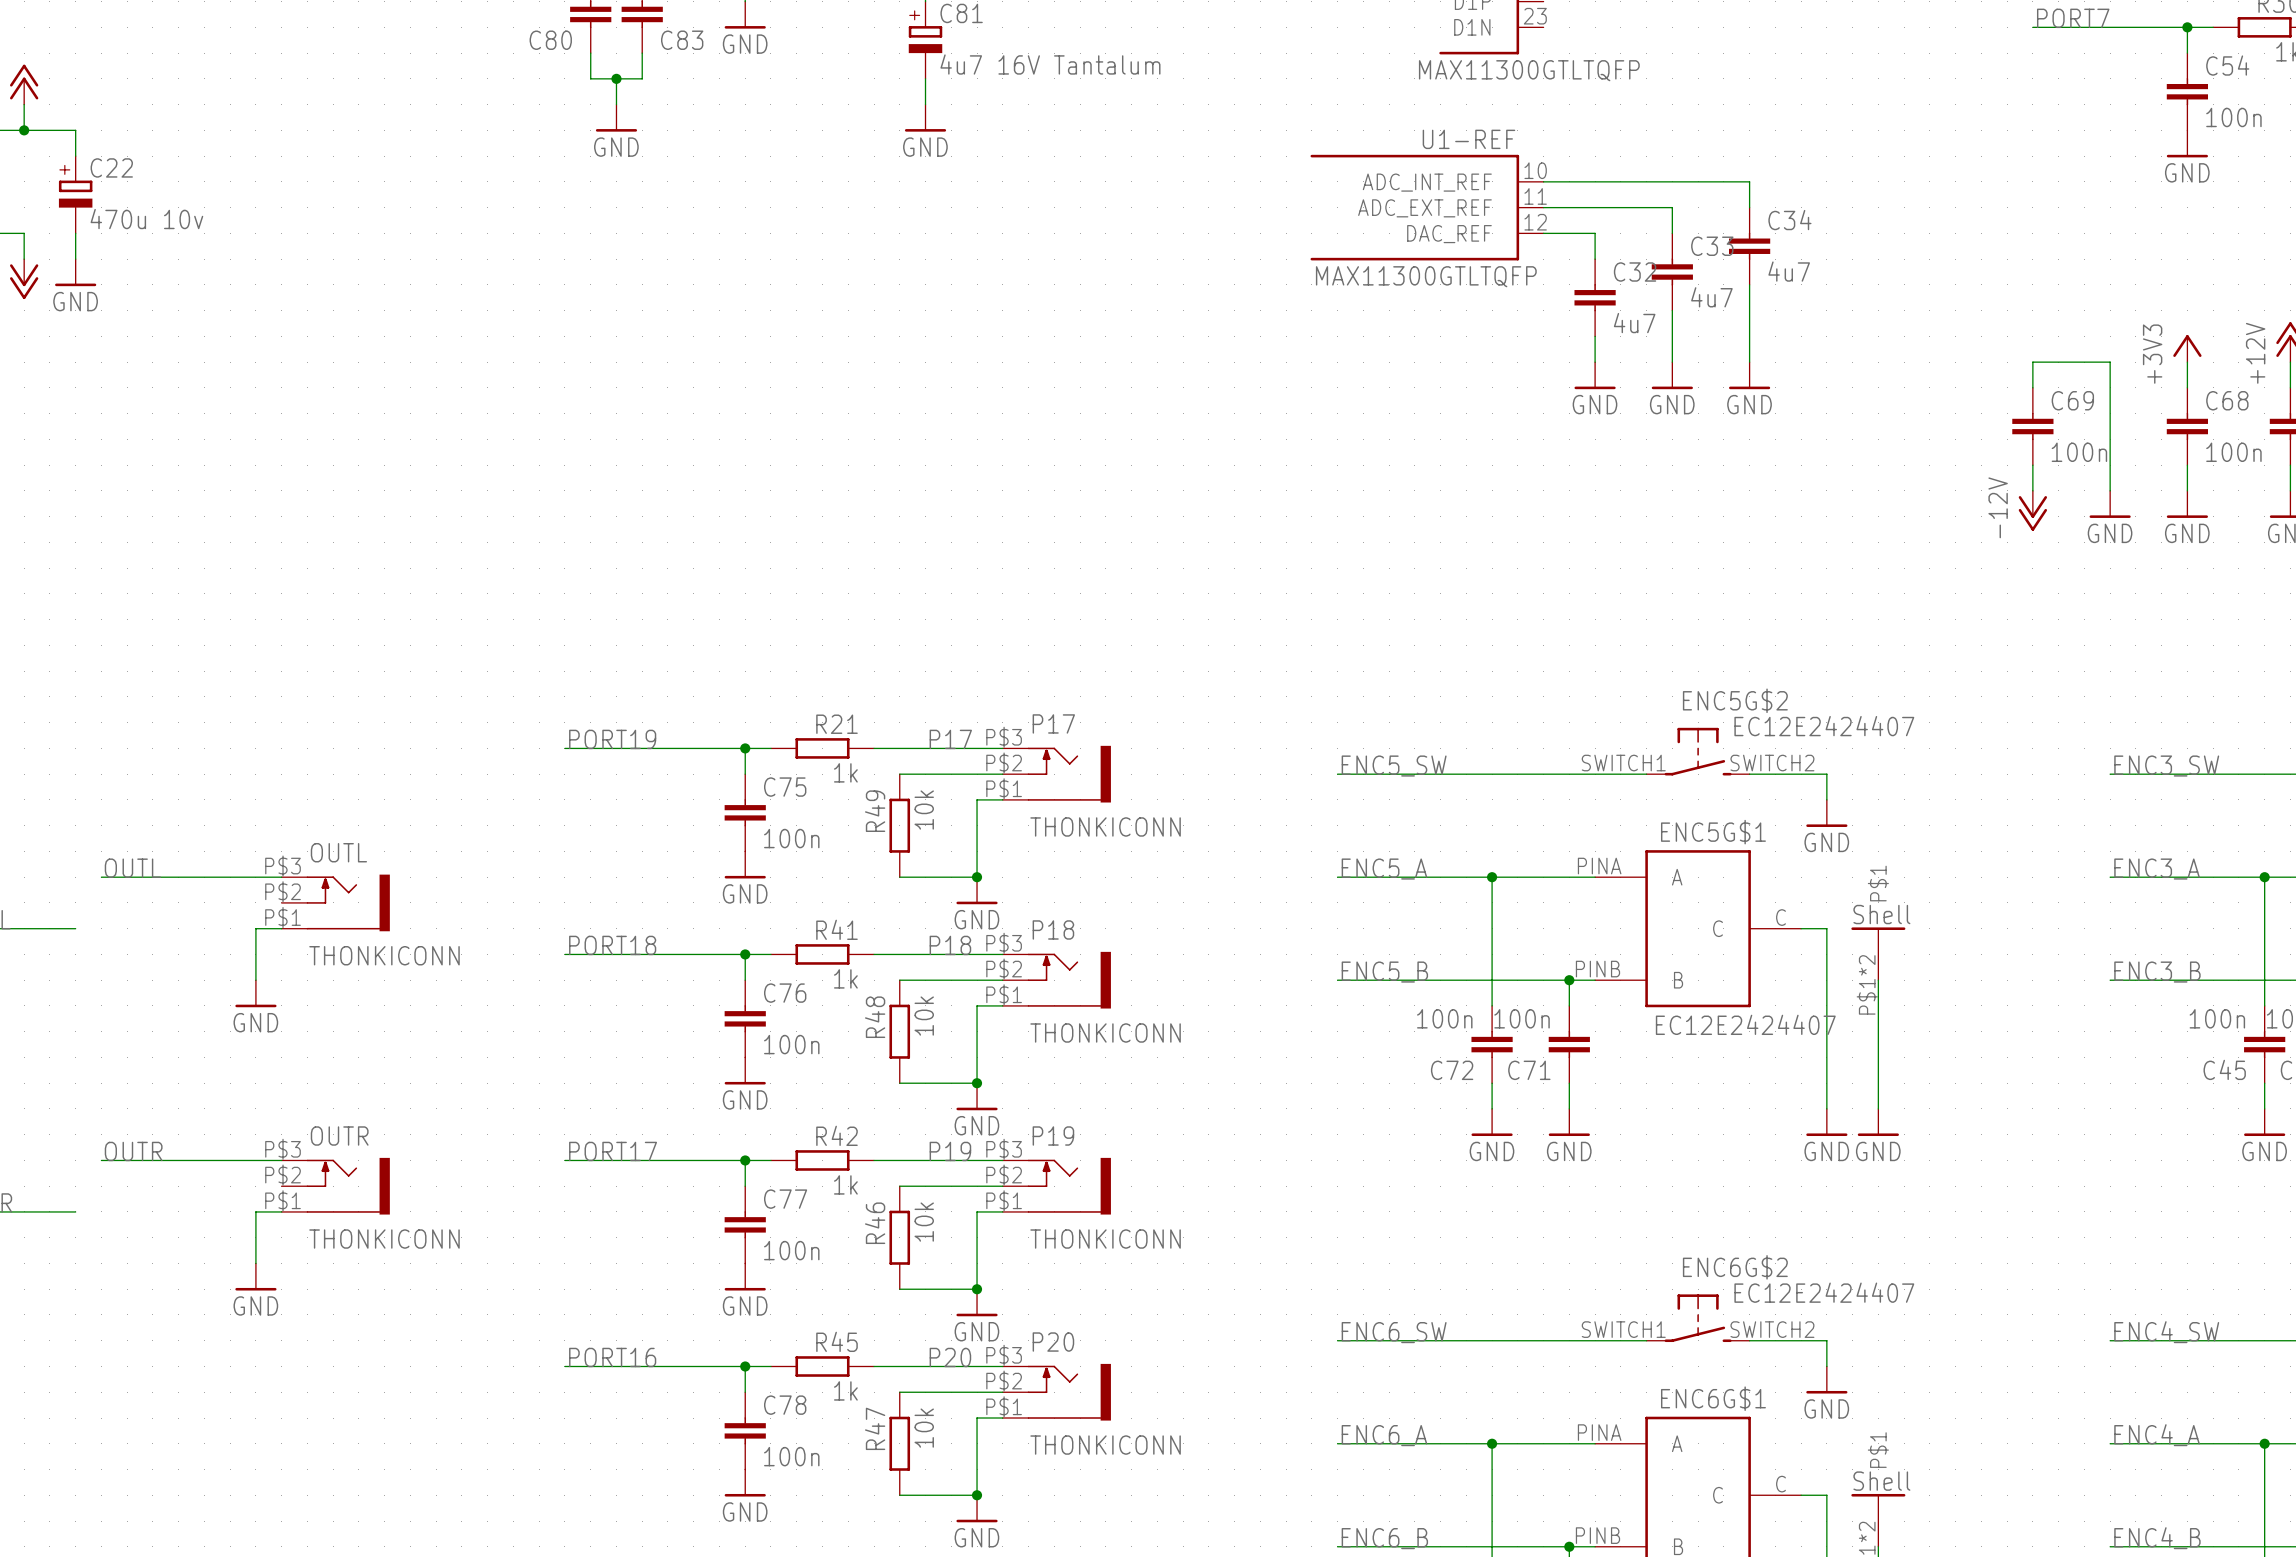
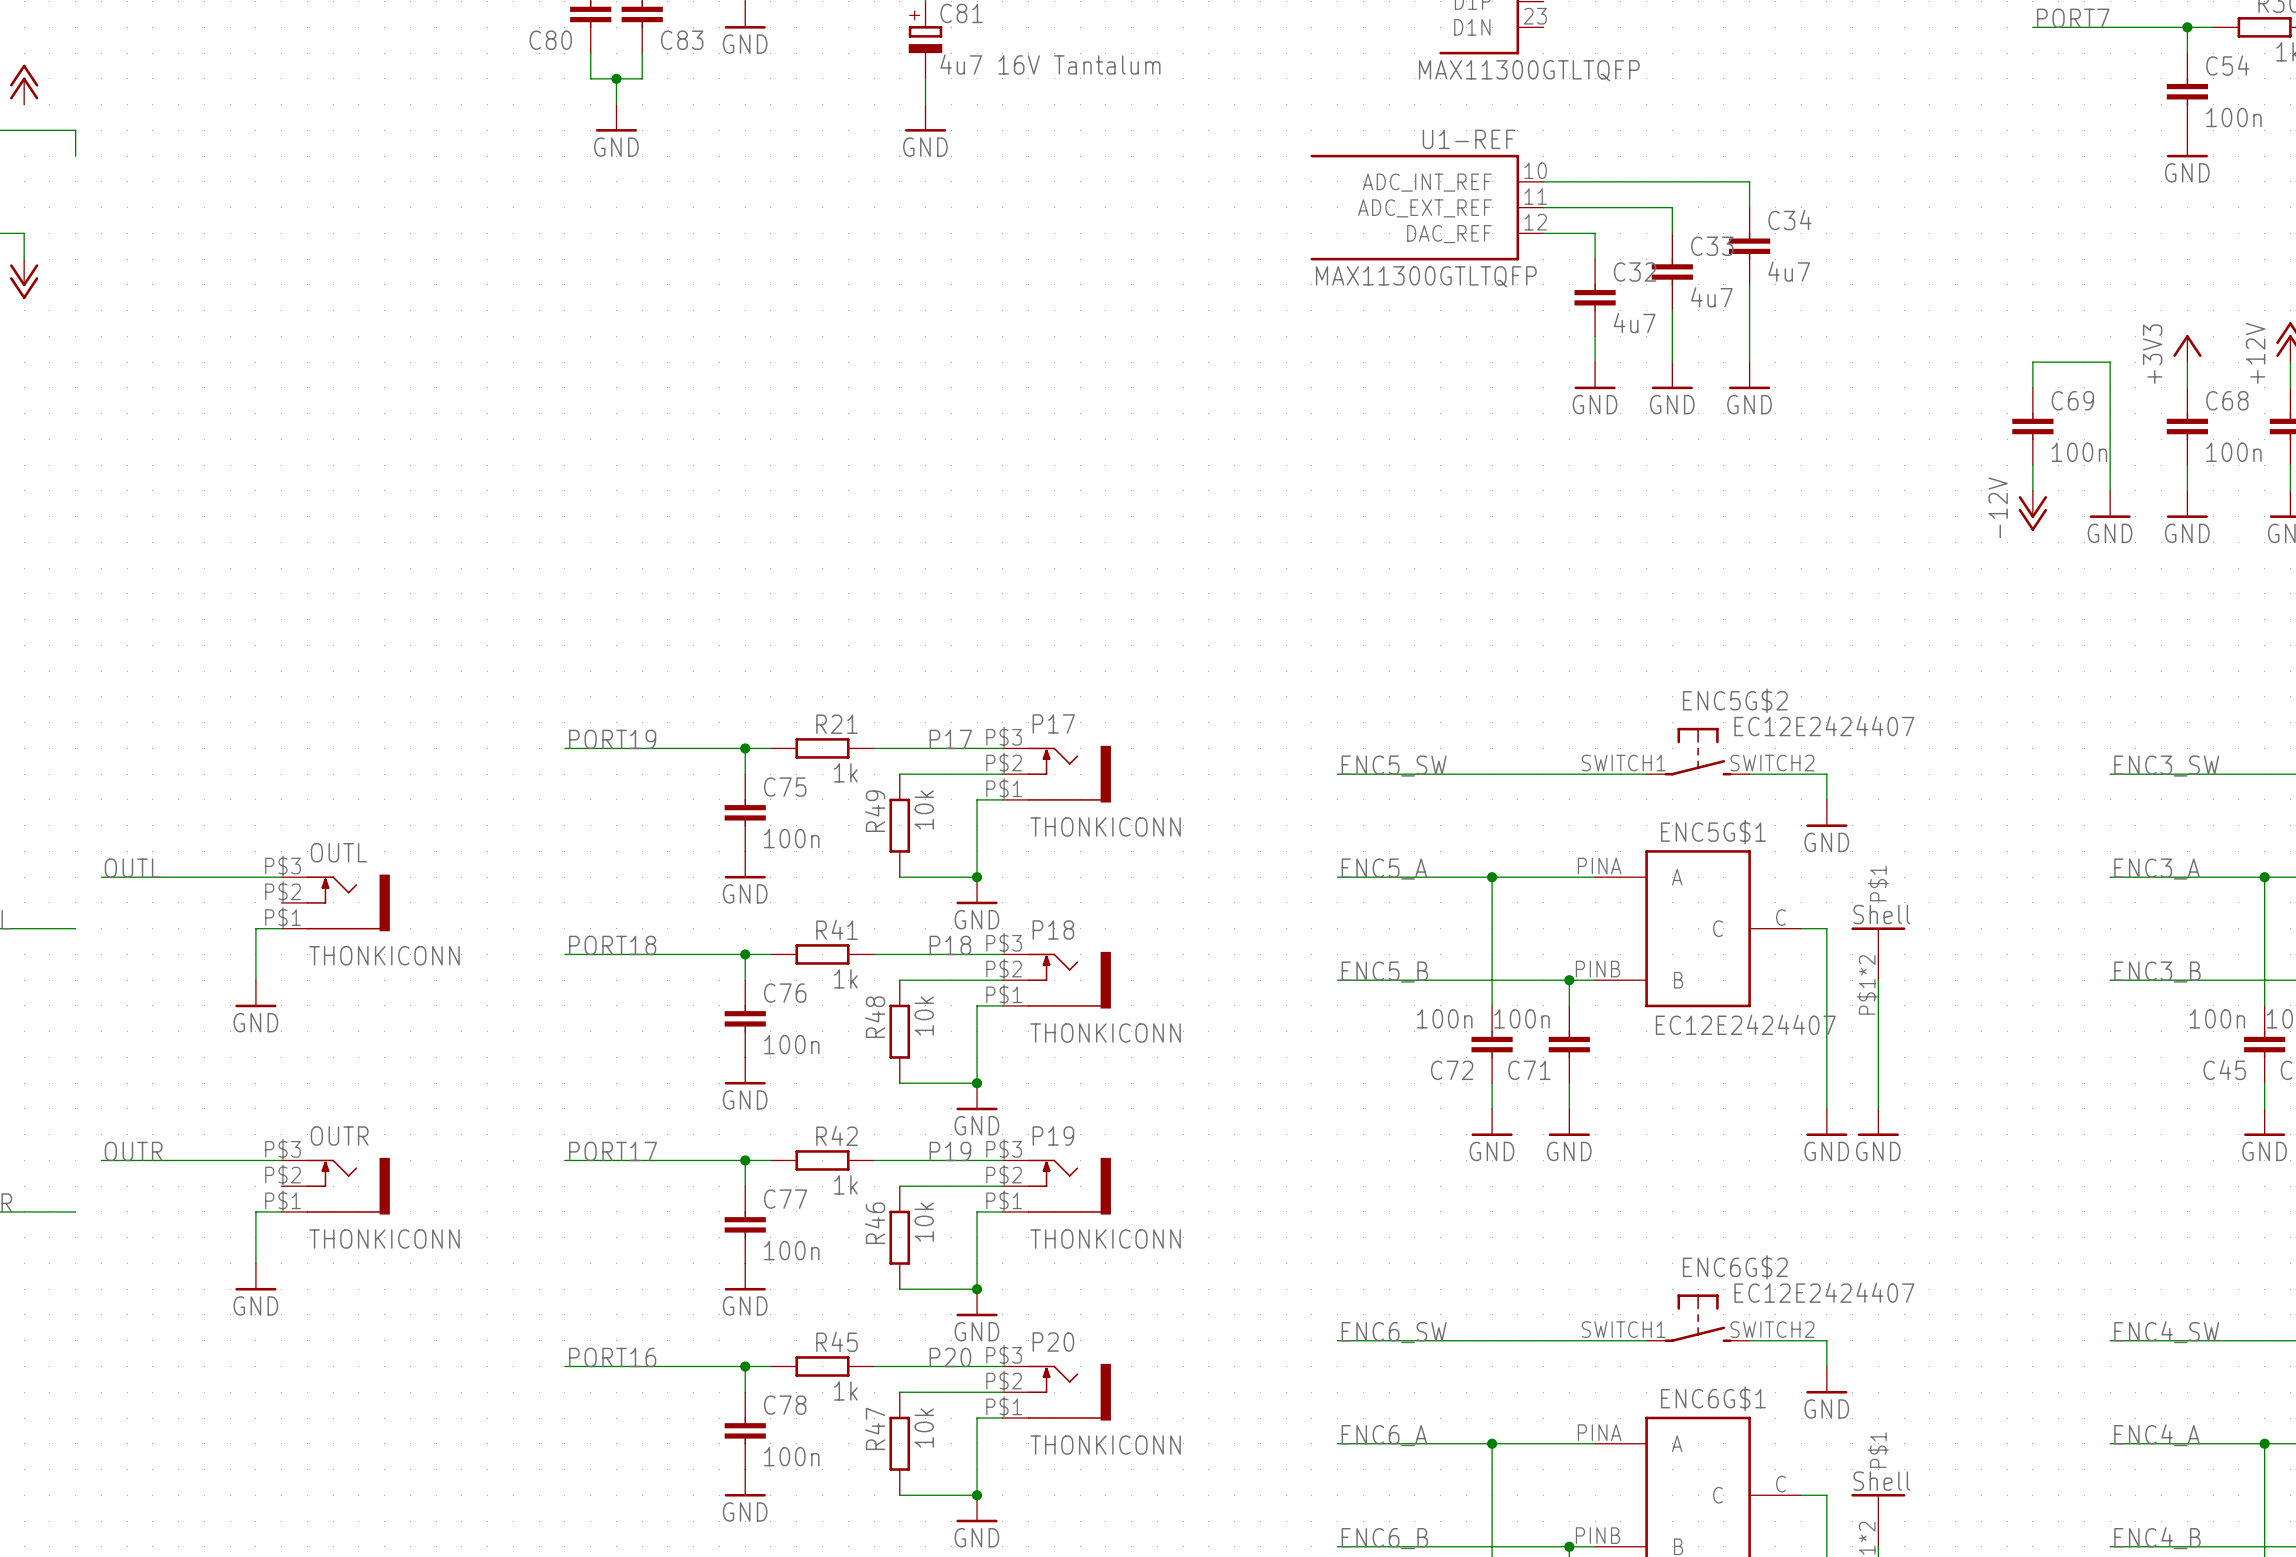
wire: (24, 104) (24, 130) -> none
junction: (24, 130) -> none
C22: 470u 10v (75, 194) -> none
wire: (75, 233) (75, 259) -> none
power symbol: GND (75, 272) -> none

